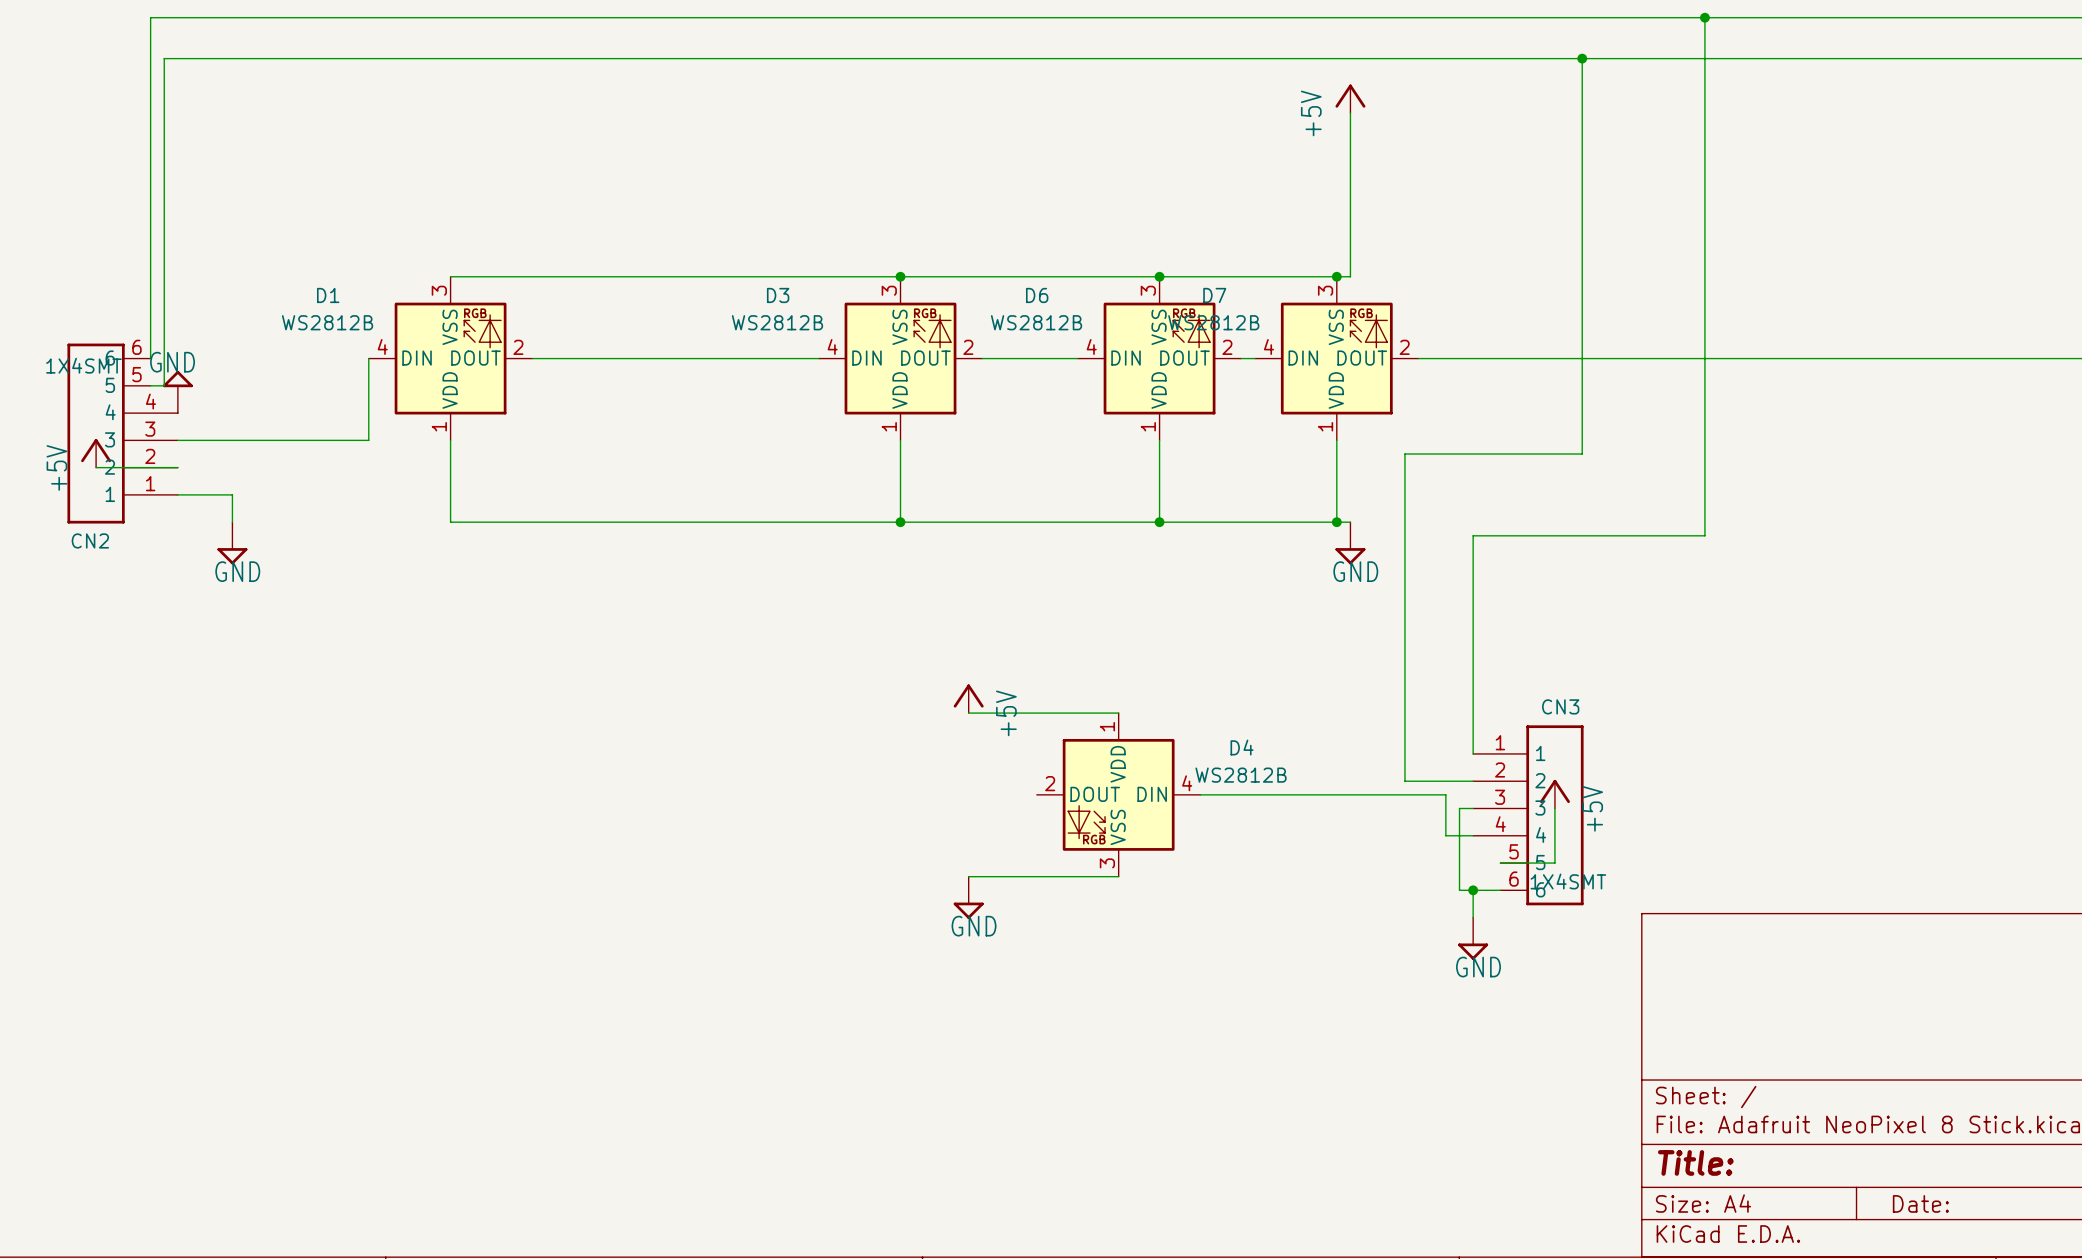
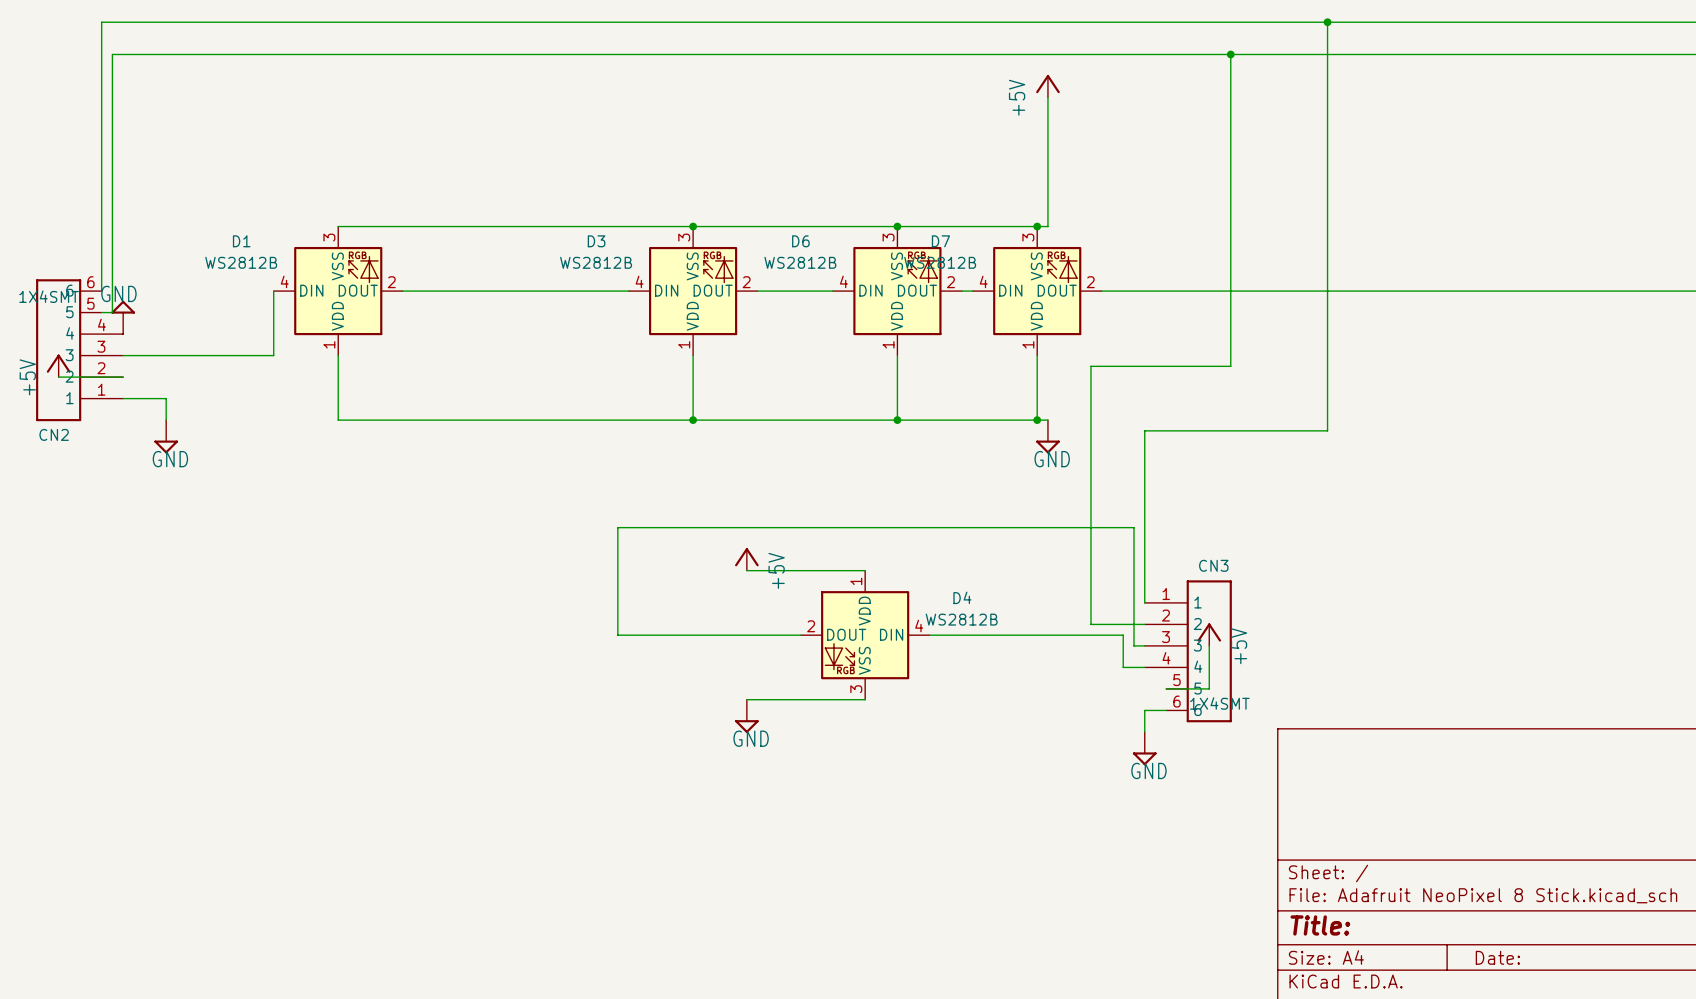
wire: (1459, 808) (1459, 890) (1473, 890) -> (1133, 645) (1133, 527) (617, 527) (617, 635) (800, 635)
junction: (1473, 890) -> none

